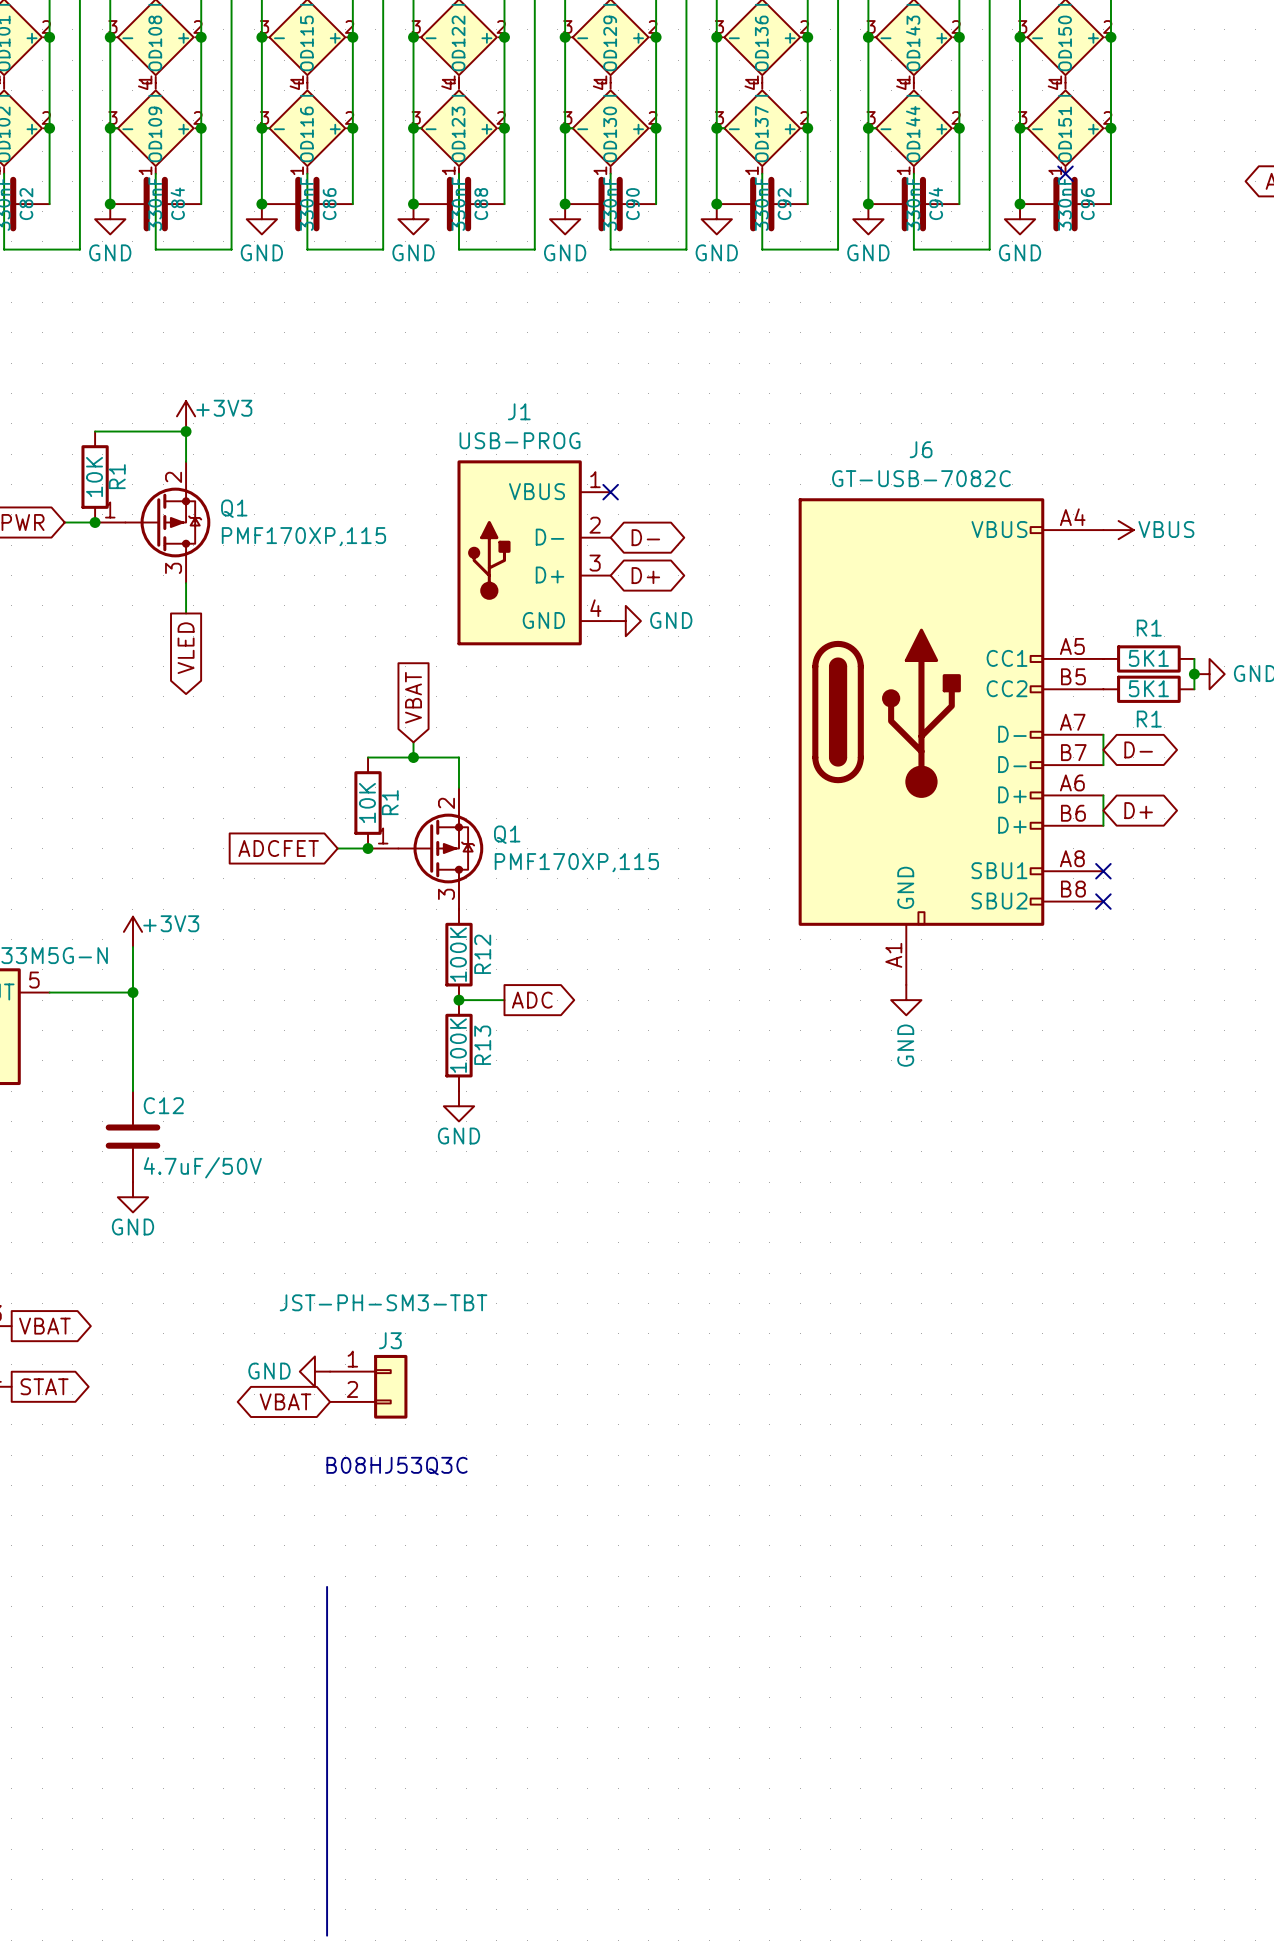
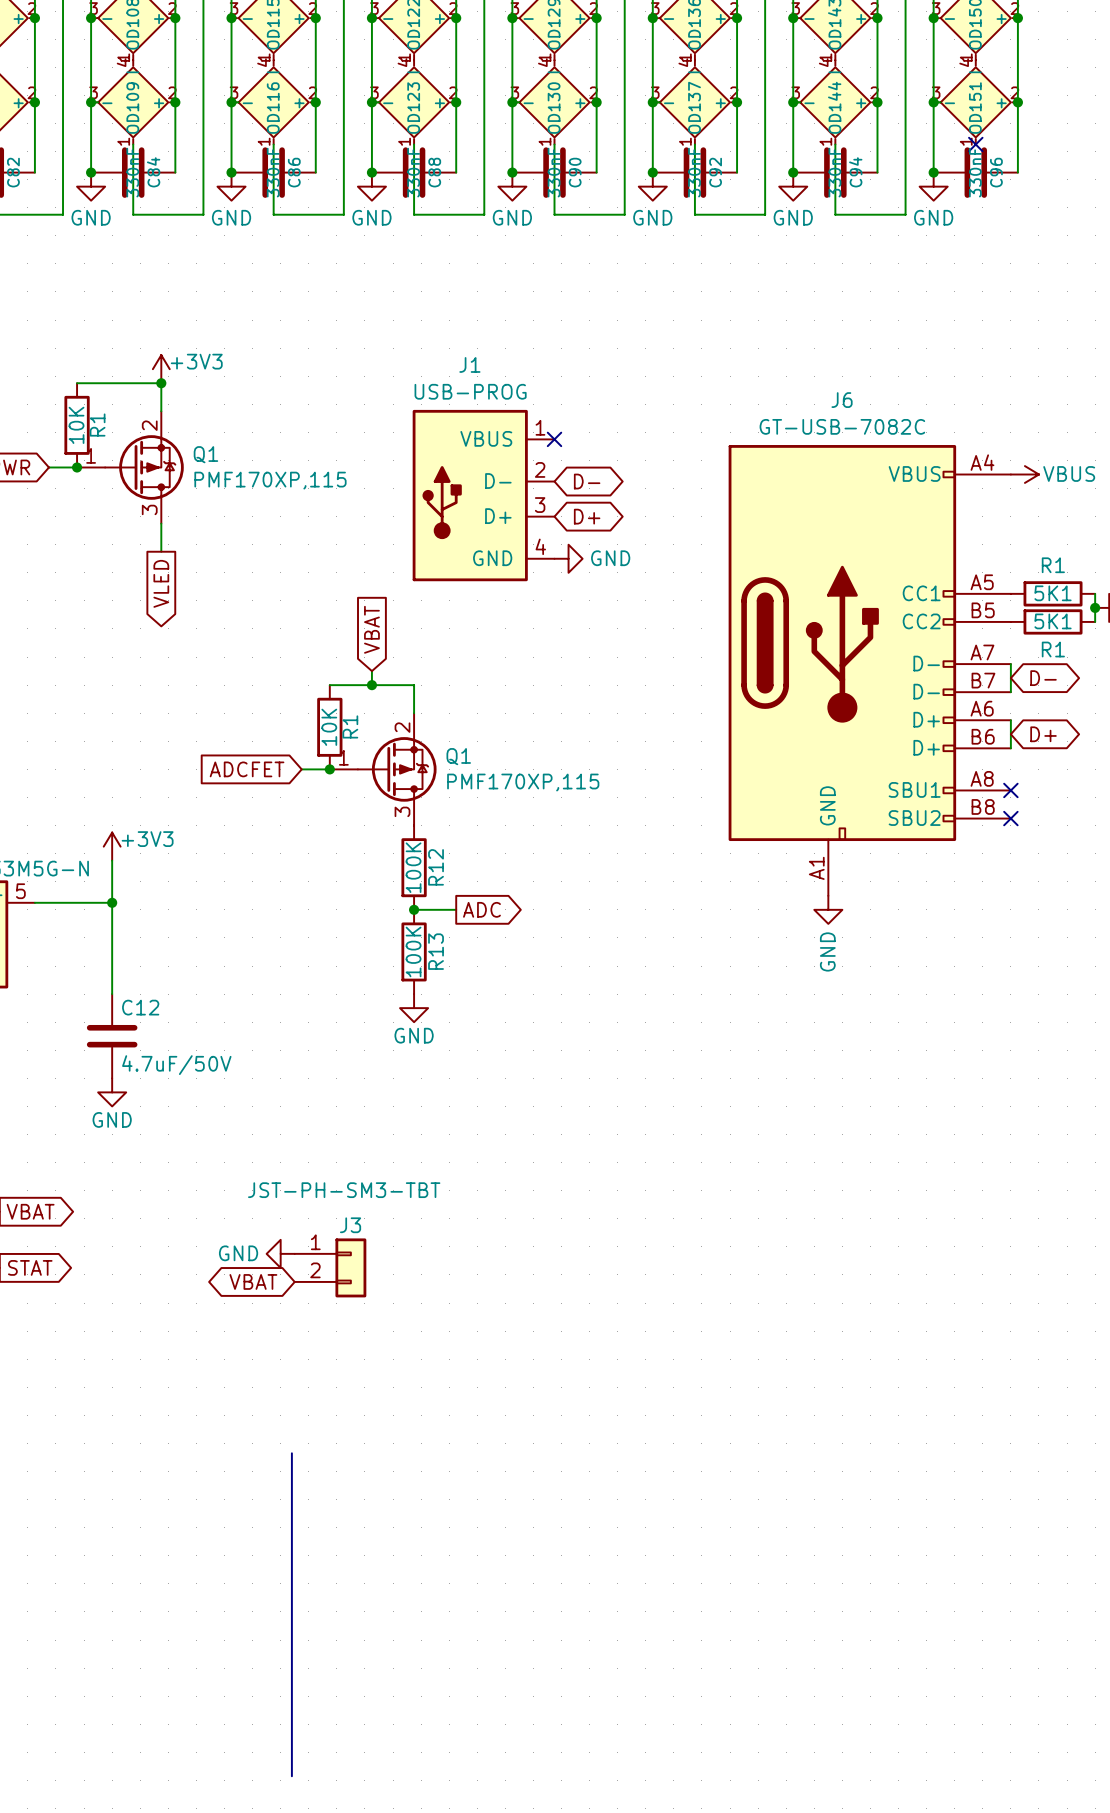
text: B08HJ53Q3C (397, 1466) -> none

